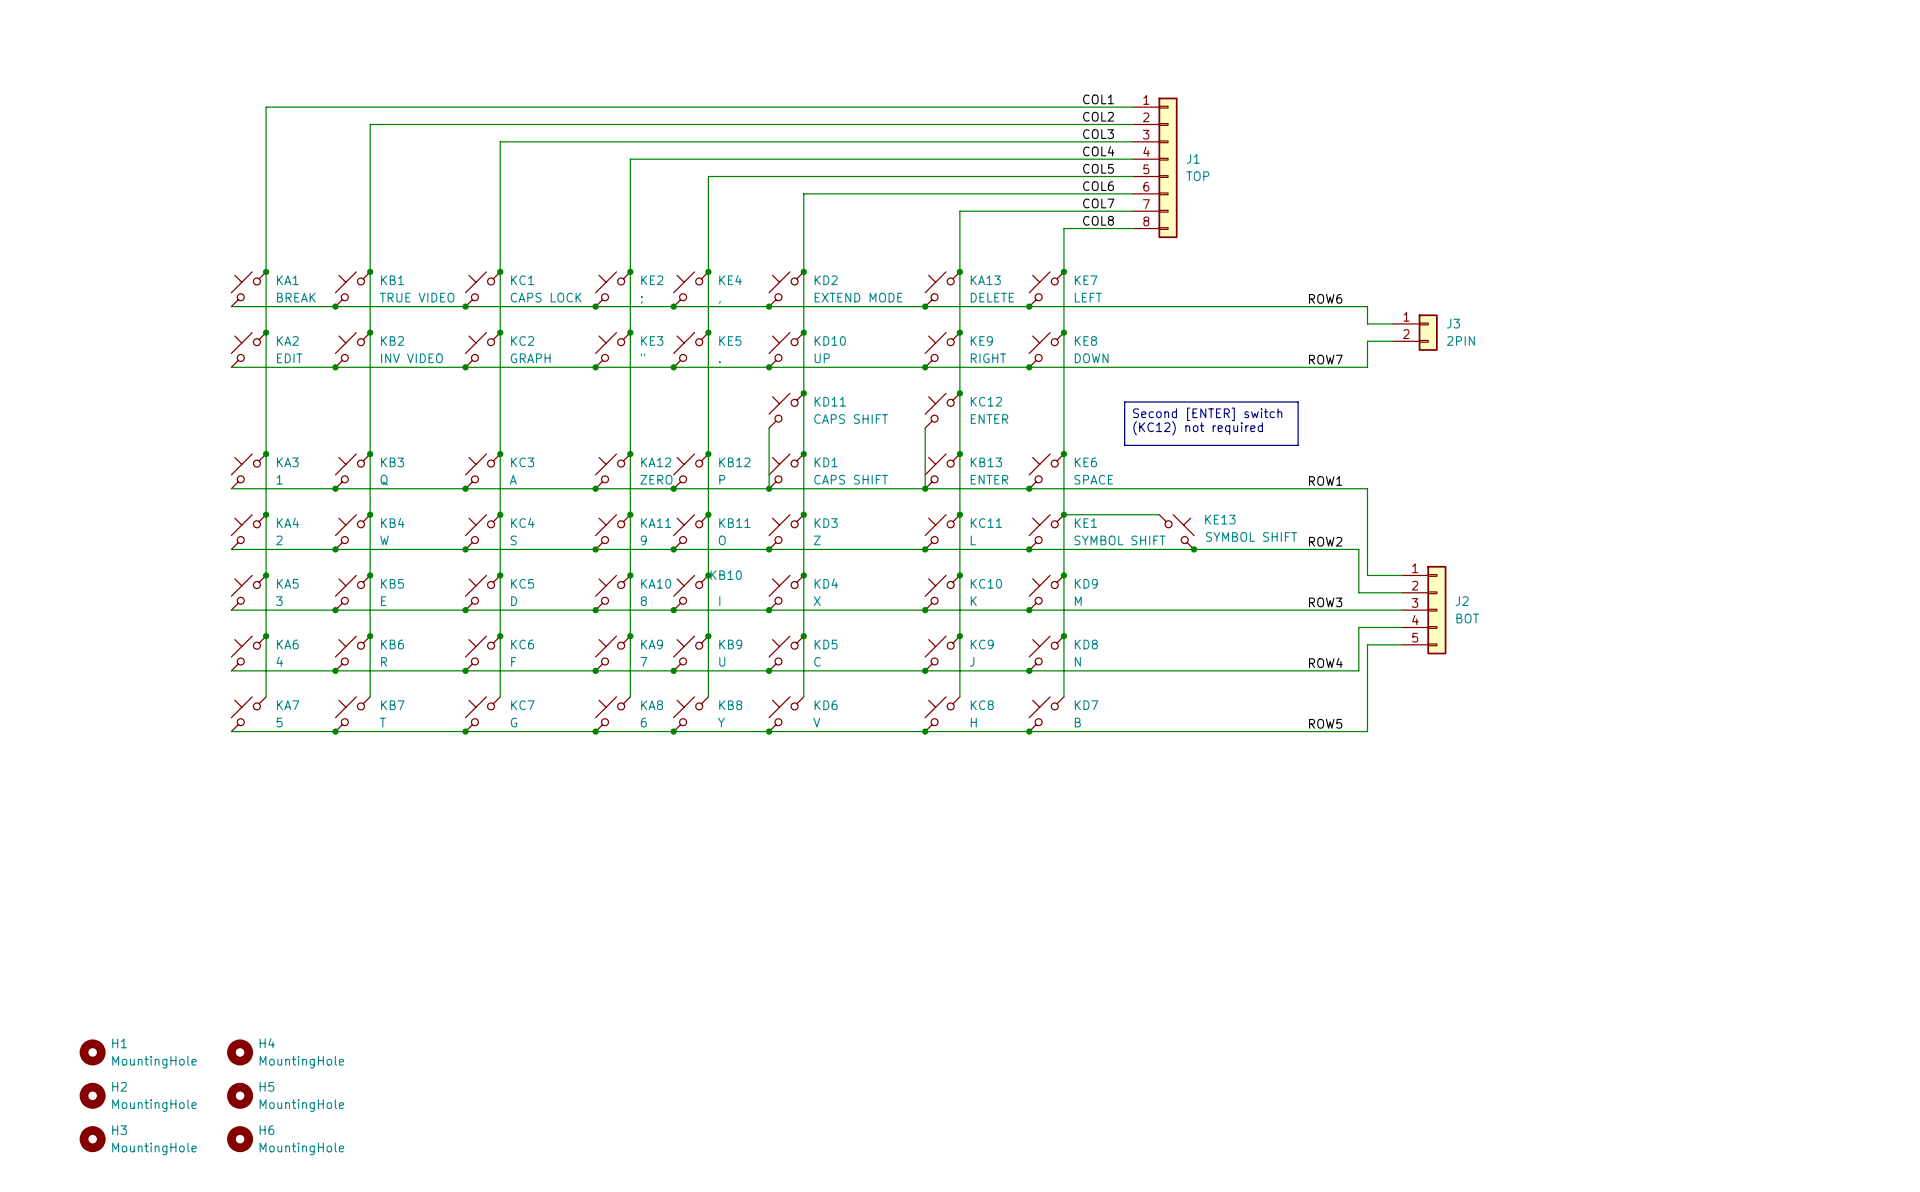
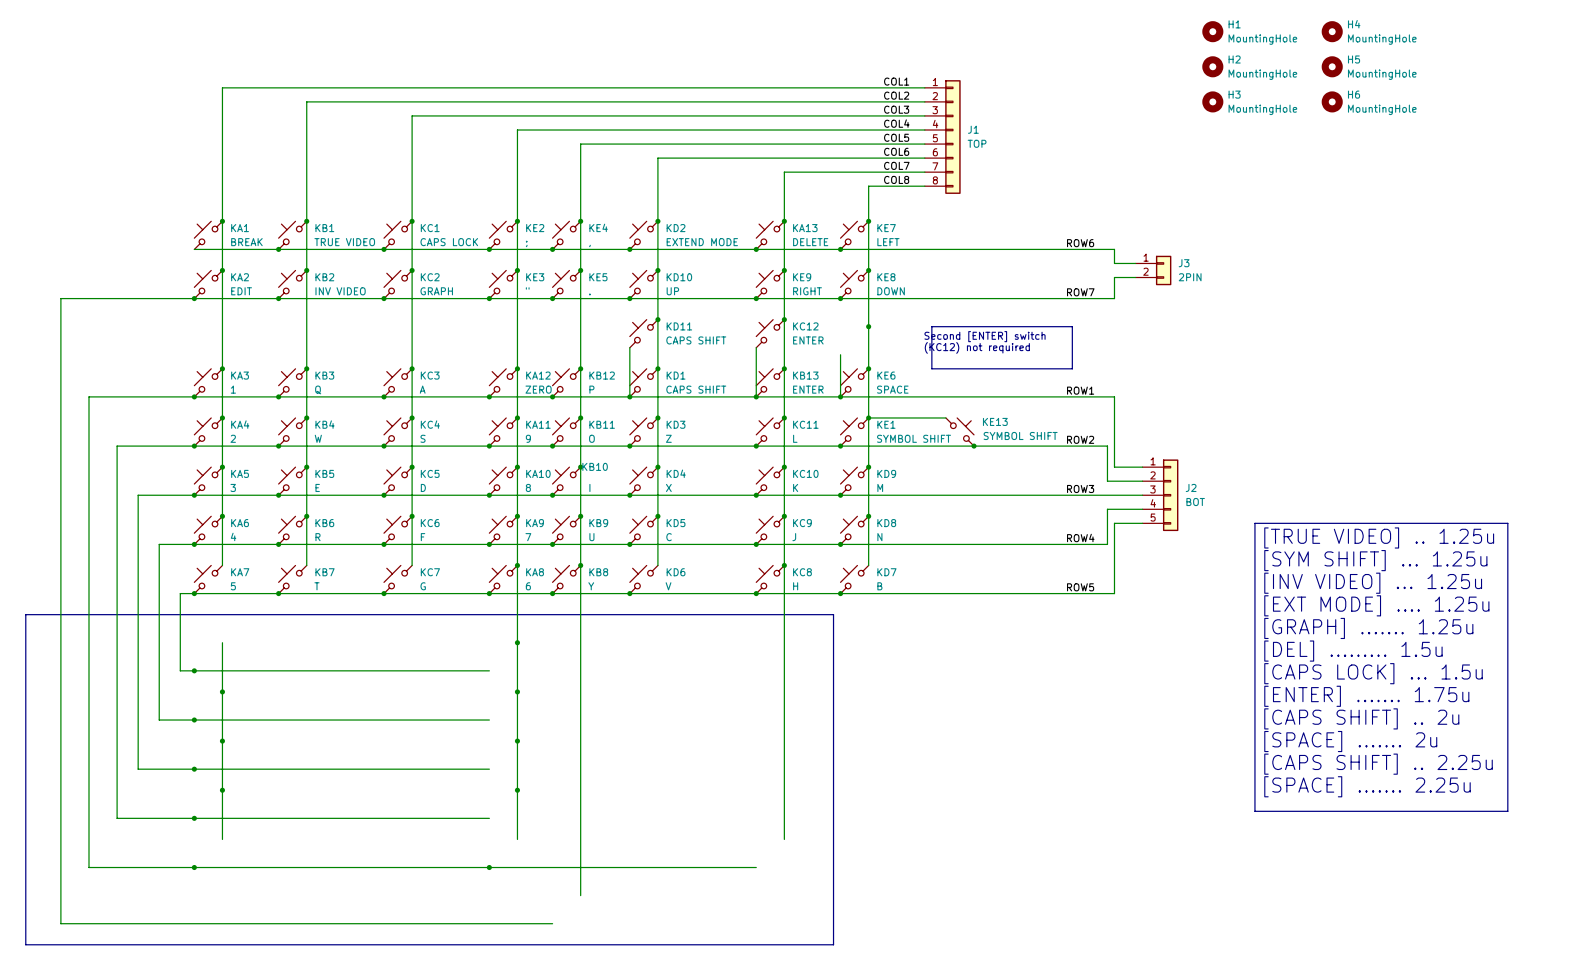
wire: none -> (194, 298) (60, 298) (60, 923) (552, 923)
junction: none -> (194, 298)
junction: none -> (868, 326)
line: (1142, 402) (1124, 402) (1124, 445) (1298, 445) (1298, 402) -> (931, 326) (931, 368) (1072, 368) (1072, 326) (1058, 326)
wire: none -> (840, 354) (840, 396)
wire: none -> (194, 396) (88, 396) (88, 867) (756, 867)
junction: none -> (194, 396)
wire: none -> (194, 446) (117, 446) (117, 818) (489, 818)
junction: none -> (194, 446)
wire: none -> (194, 495) (138, 495) (138, 769) (489, 769)
junction: none -> (194, 495)
line: none -> (1254, 523) (1507, 523) (1507, 811) (1254, 811) (1254, 523)
text: none -> [TRUE VIDEO] .. 1.25u (1379, 537)
wire: none -> (194, 544) (159, 544) (159, 720) (489, 720)
junction: none -> (194, 544)
text: none -> [SYM SHIFT] ... 1.25u (1375, 560)
wire: none -> (517, 565) (517, 839)
junction: none -> (517, 565)
wire: none -> (580, 565) (580, 895)
junction: none -> (580, 565)
wire: none -> (784, 565) (784, 839)
junction: none -> (784, 565)
text: none -> [INV VIDEO] ... 1.25u (1373, 583)
wire: none -> (194, 593) (180, 593) (180, 670) (489, 670)
junction: none -> (194, 593)
text: none -> [EXT MODE] .... 1.25u (1376, 605)
line: none -> (25, 614) (833, 614) (833, 944) (25, 944) (25, 614)
text: none -> [GRAPH] ....... 1.25u (1368, 628)
wire: none -> (222, 642) (222, 839)
junction: none -> (517, 642)
text: none -> [DEL] ......... 1.5u (1353, 651)
junction: none -> (194, 670)
text: none -> [CAPS LOCK] ... 1.5u (1373, 673)
junction: none -> (222, 691)
junction: none -> (517, 691)
text: none -> [ENTER] ....... 1.75u (1366, 696)
text: none -> [CAPS SHIFT] .. 2u (1361, 718)
junction: none -> (194, 720)
junction: none -> (222, 741)
junction: none -> (517, 741)
text: none -> [SPACE] ....... 2u (1350, 741)
text: none -> [CAPS SHIFT] .. 2.25u (1378, 764)
junction: none -> (194, 769)
text: none -> [SPACE] ....... 2.25u (1367, 786)
junction: none -> (222, 790)
junction: none -> (517, 790)
junction: none -> (194, 818)
H1 position: (92, 1052) -> (1212, 31)
H4 position: (240, 1052) -> (1332, 31)
junction: none -> (194, 867)
junction: none -> (489, 867)
H2 position: (92, 1095) -> (1212, 66)
H5 position: (240, 1095) -> (1332, 66)
H3 position: (92, 1139) -> (1212, 101)
H6 position: (240, 1139) -> (1332, 101)

